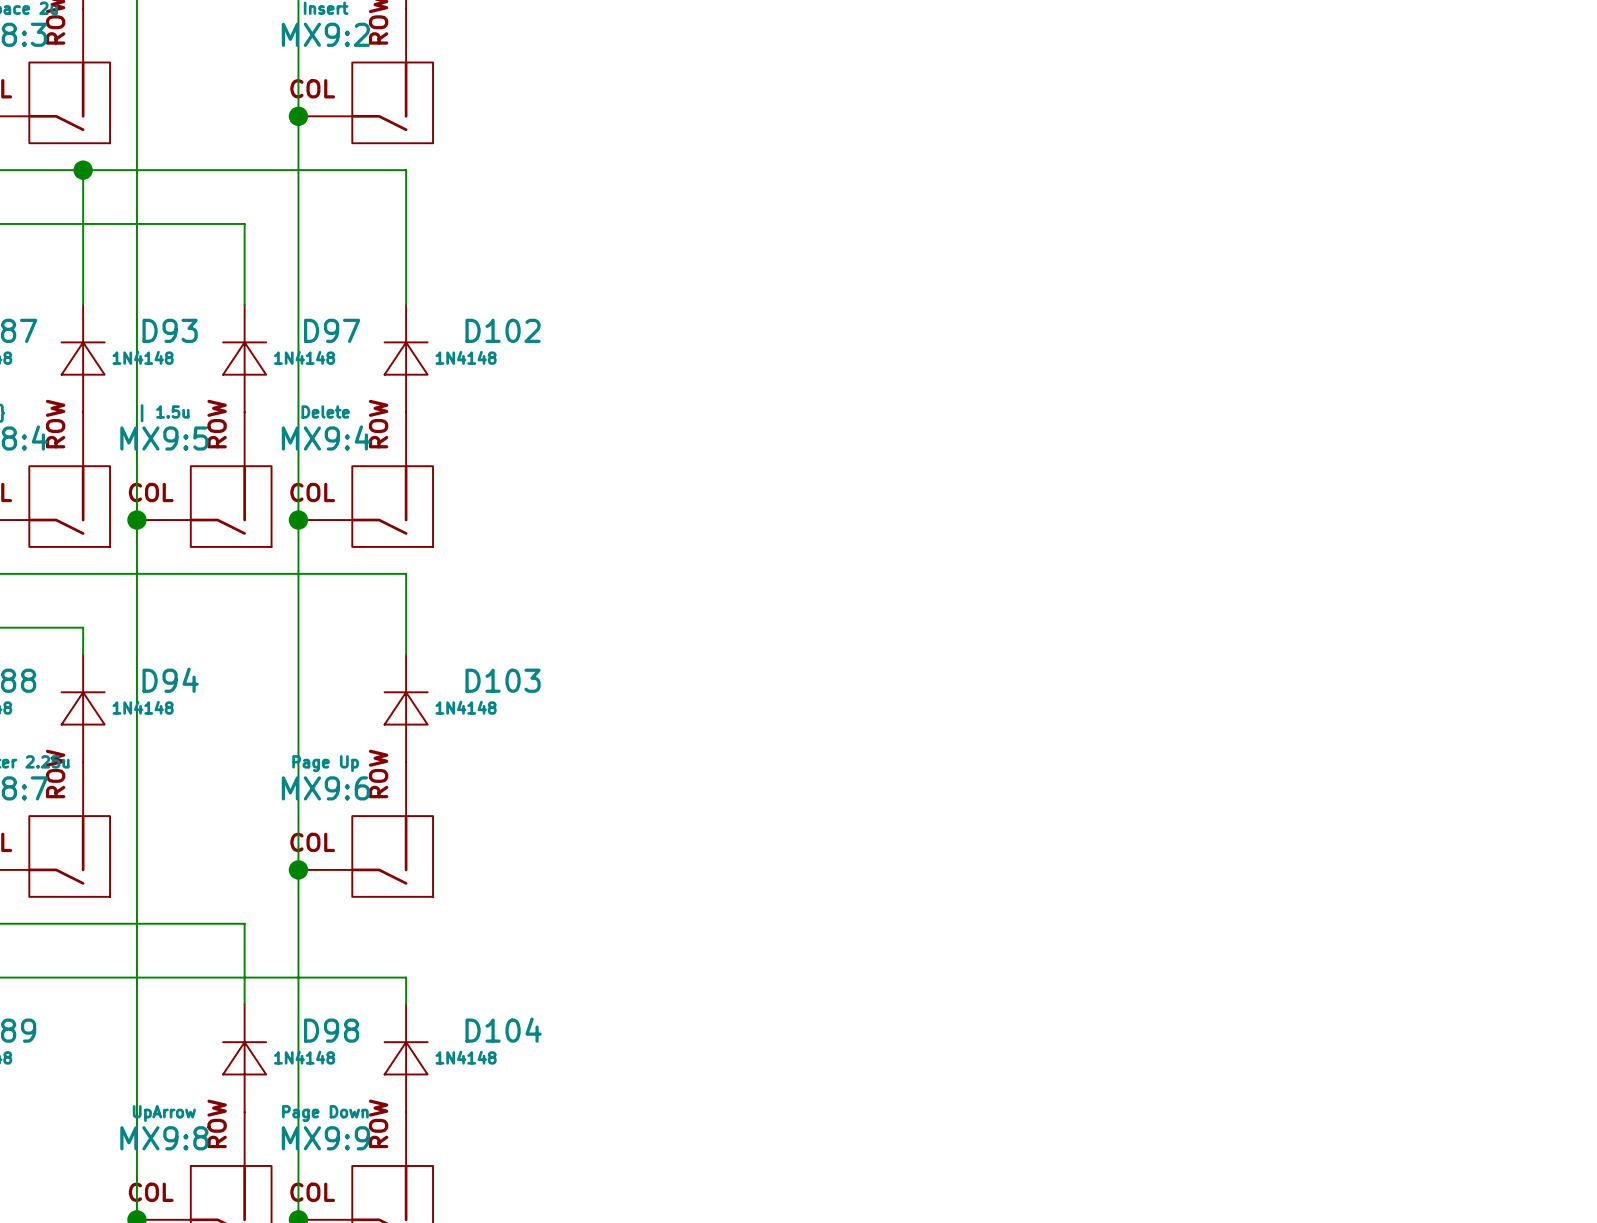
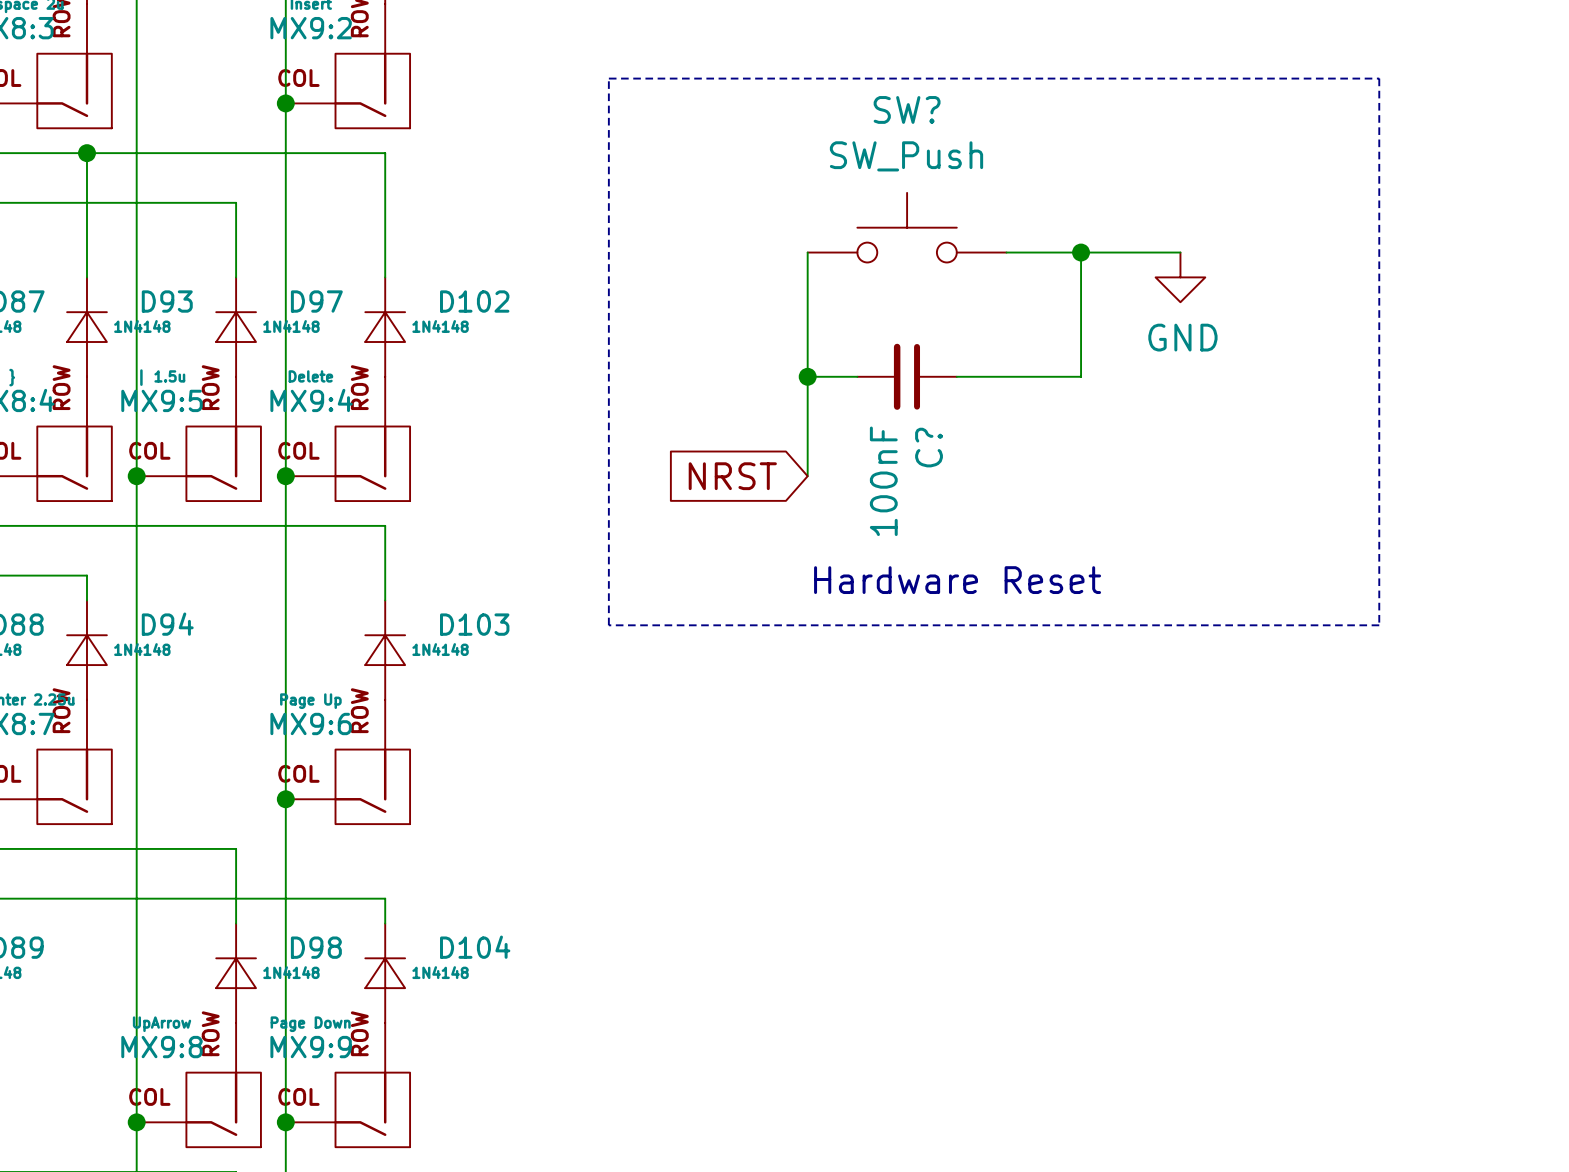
line: none -> (608, 78) (1379, 78) (1379, 625) (608, 625) (608, 78)
SW?: none -> SW_Push (907, 227)
wire: none -> (807, 252) (807, 476)
wire: none -> (1006, 252) (1180, 252)
wire: none -> (1081, 252) (1081, 376) (956, 376)
junction: none -> (1081, 252)
power symbol: none -> GND (1180, 277)
wire: none -> (807, 376) (857, 376)
junction: none -> (807, 376)
C?: none -> 100nF (907, 376)
global label: none -> NRST (732, 476)
text: none -> Hardware Reset (957, 580)

